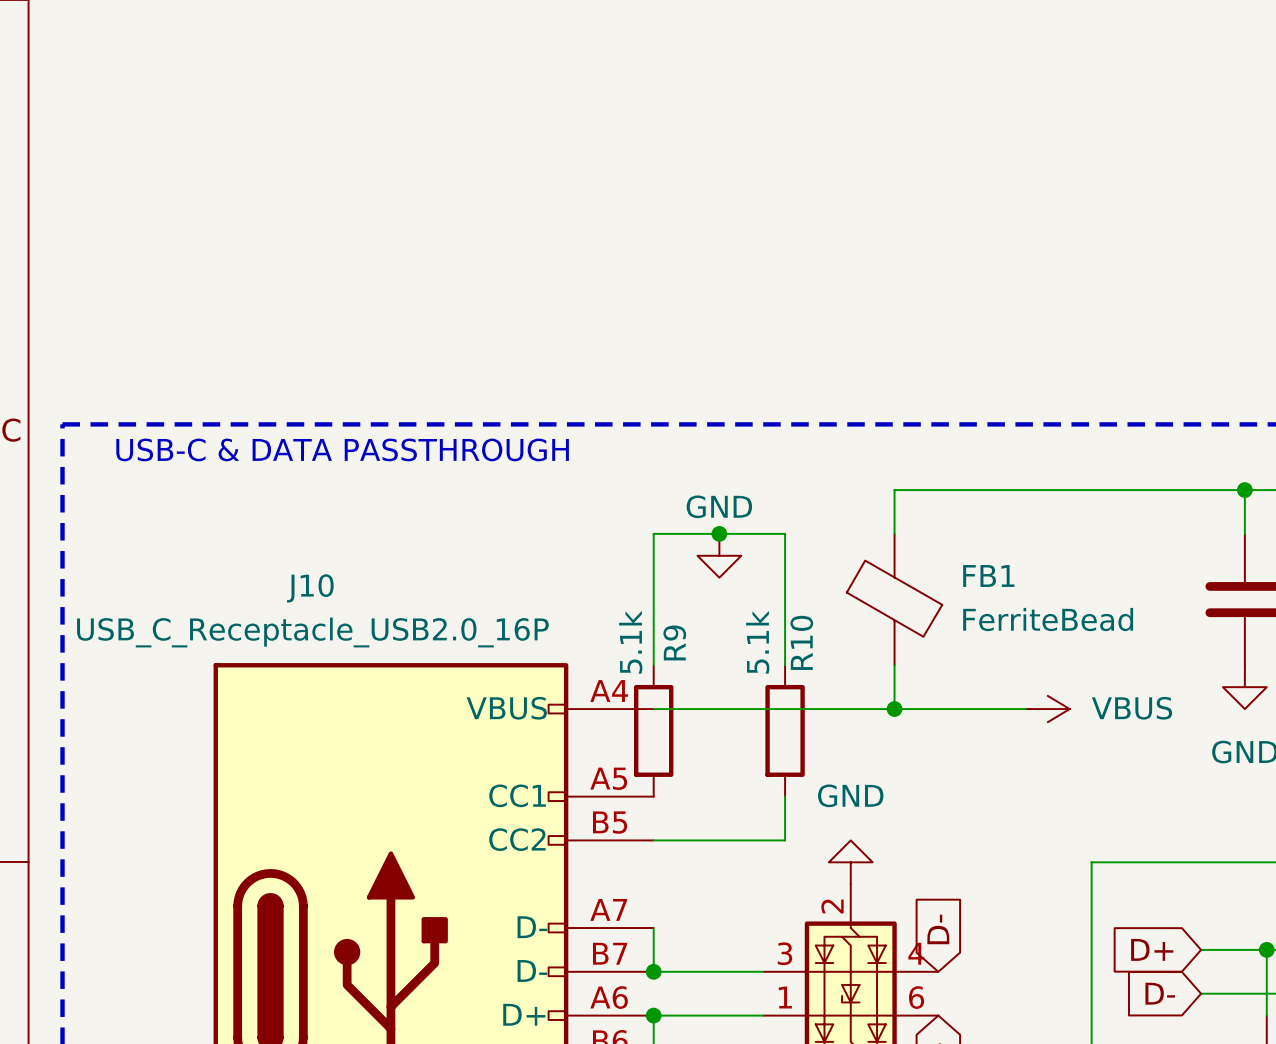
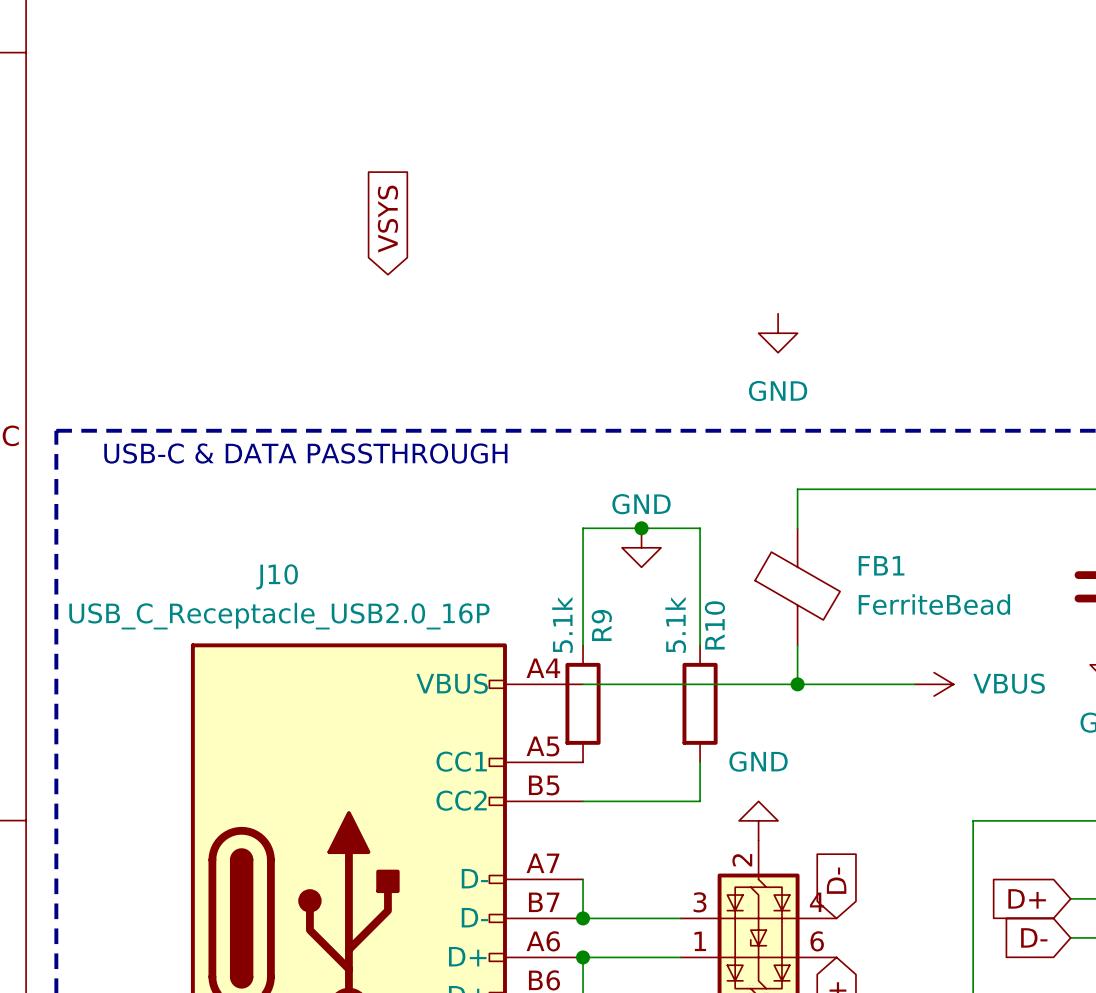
global label: none -> VSYS (387, 219)
power symbol: none -> GND (778, 333)

